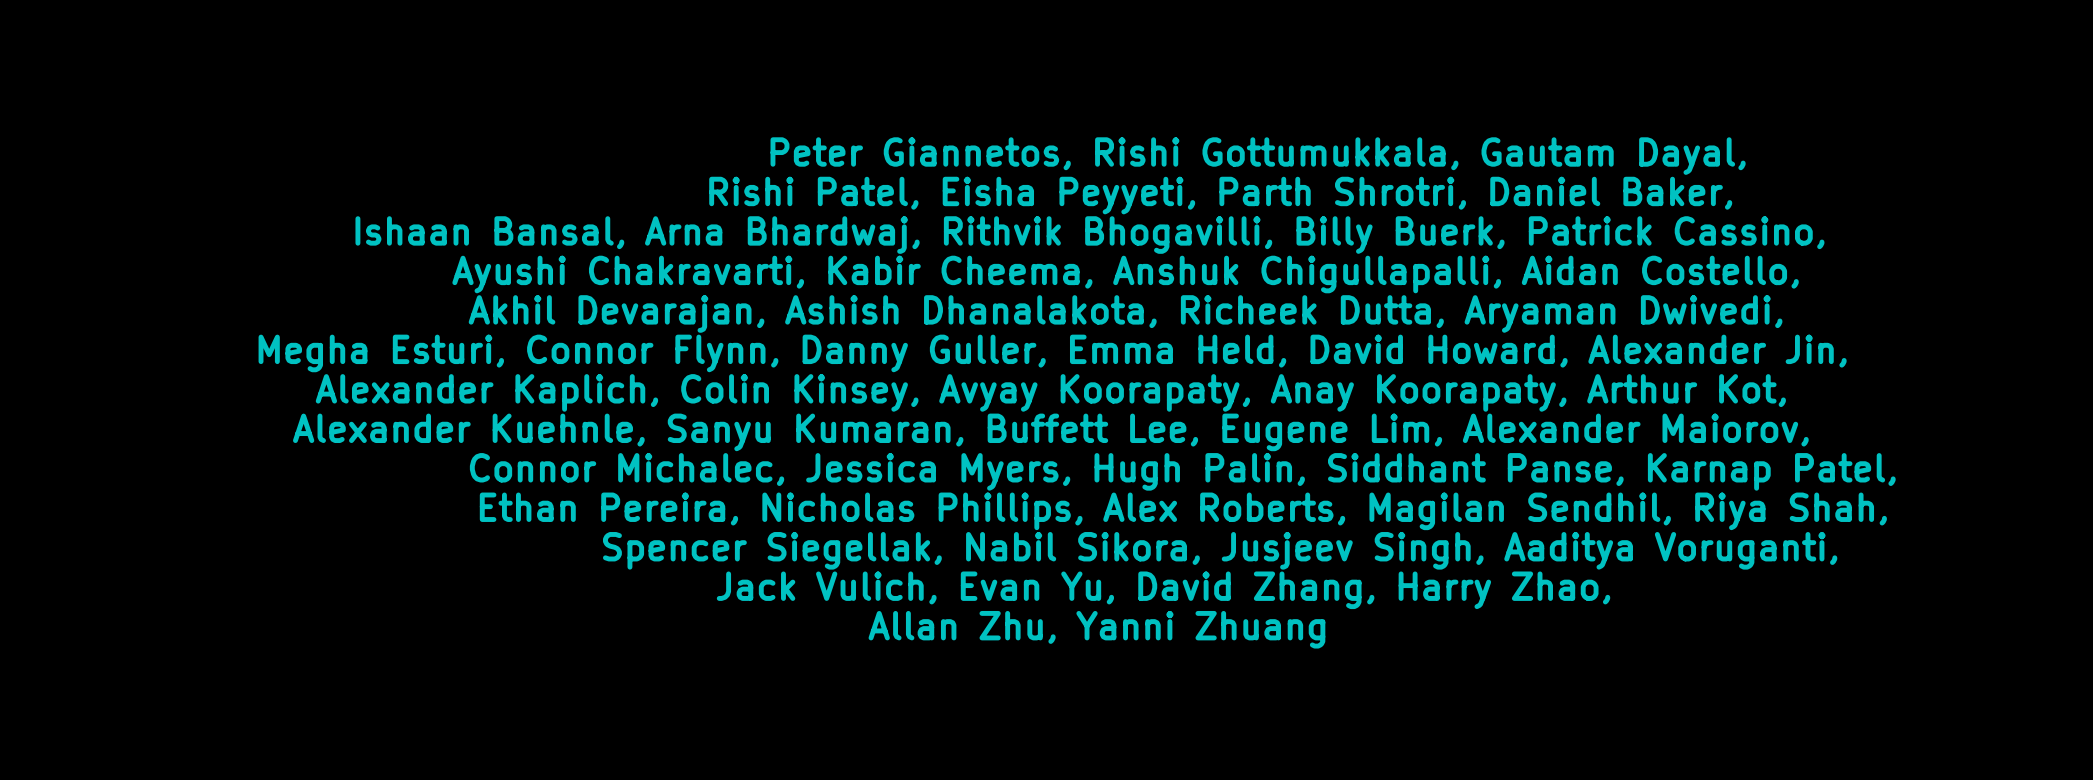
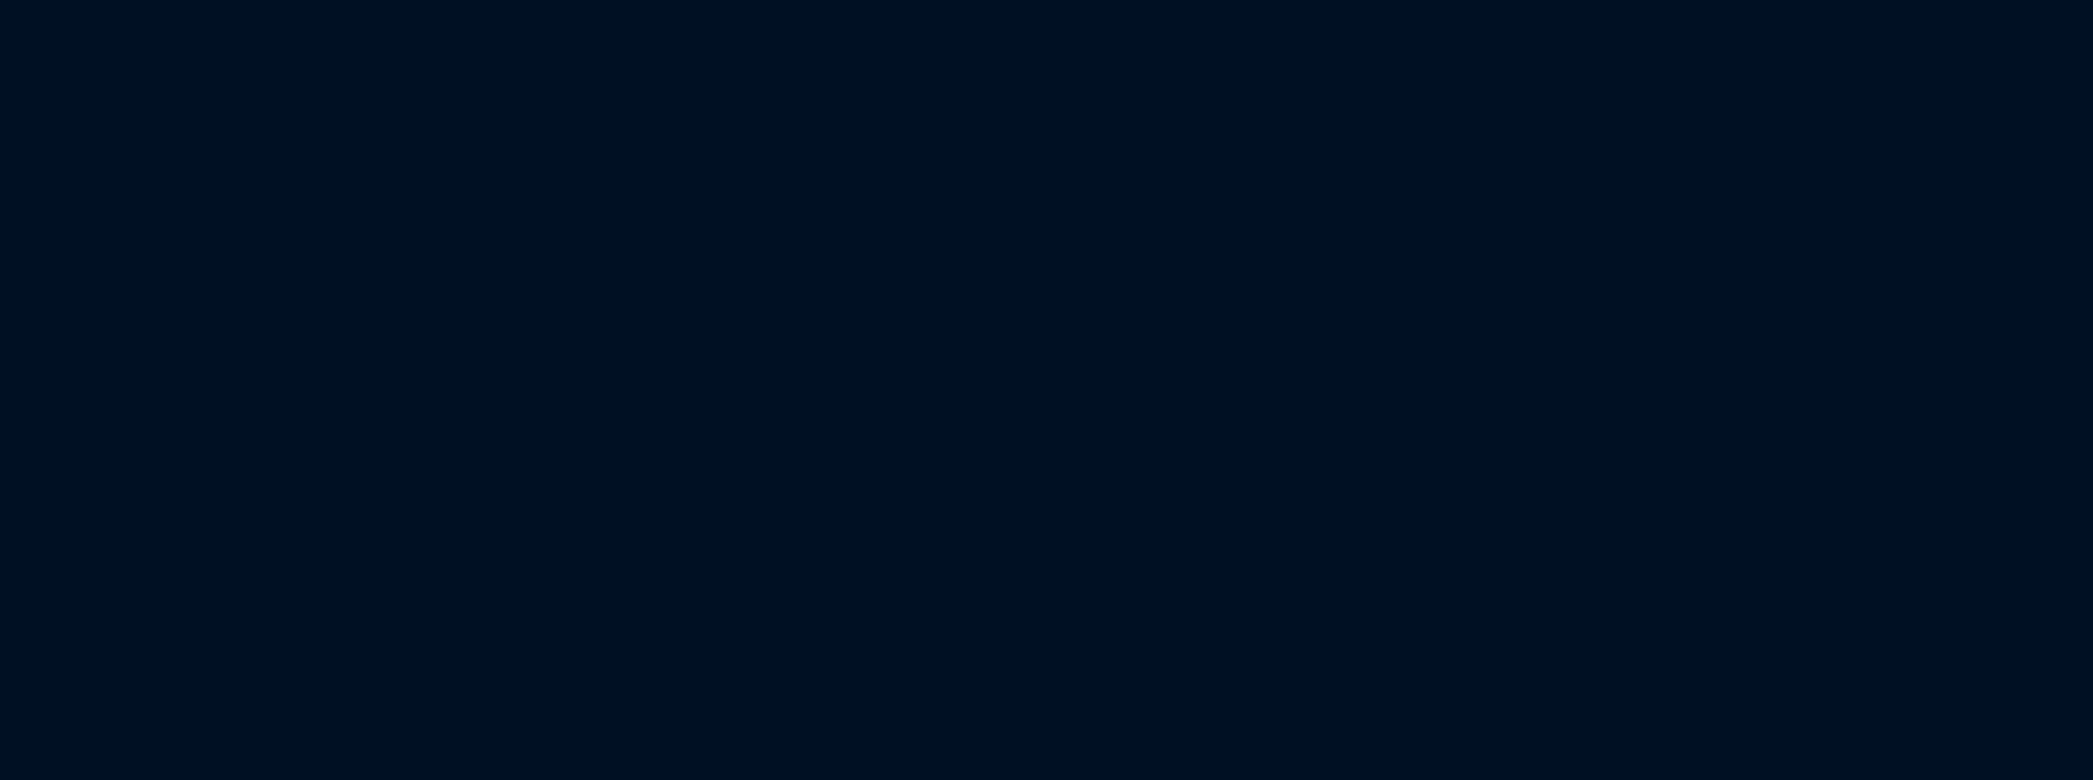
text: Peter Giannetos, Rishi Gottumukkala, Gautam Dayal, (1258, 156) -> none
text: Rishi Patel, Eisha Peyyeti, Parth Shrotri, Daniel Baker, (1220, 195) -> none
text: Ishaan Bansal, Arna Bhardwaj, Rithvik Bhogavilli, Billy Buerk, Patrick Cassino, (1089, 235) -> none
text: Ayushi Chakravarti, Kabir Cheema, Anshuk Chigullapalli, Aidan Costello, (1125, 274) -> none
text: Akhil Devarajan, Ashish Dhanalakota, Richeek Dutta, Aryaman Dwivedi, (1125, 313) -> none
text: Megha Esturi, Connor Flynn, Danny Guller, Emma Held, David Howard, Alexander Jin, (1052, 353) -> none
text: Alexander Kaplich, Colin Kinsey, Avyay Koorapaty, Anay Koorapaty, Arthur Kot, (1050, 392) -> none
text: Alexander Kuehnle, Sanyu Kumaran, Buffett Lee, Eugene Lim, Alexander Maiorov, (1050, 432) -> none
text: Connor Michalec, Jessica Myers, Hugh Palin, Siddhant Panse, Karnap Patel, (1182, 471) -> none
text: Ethan Pereira, Nicholas Phillips, Alex Roberts, Magilan Sendhil, Riya Shah, (1183, 511) -> none
text: Spencer Siegellak, Nabil Sikora, Jusjeev Singh, Aaditya Voruganti, (1220, 550) -> none
text: Jack Vulich, Evan Yu, David Zhang, Harry Zhao, (1163, 590) -> none
text: Allan Zhu, Yanni Zhuang (1096, 629) -> none

